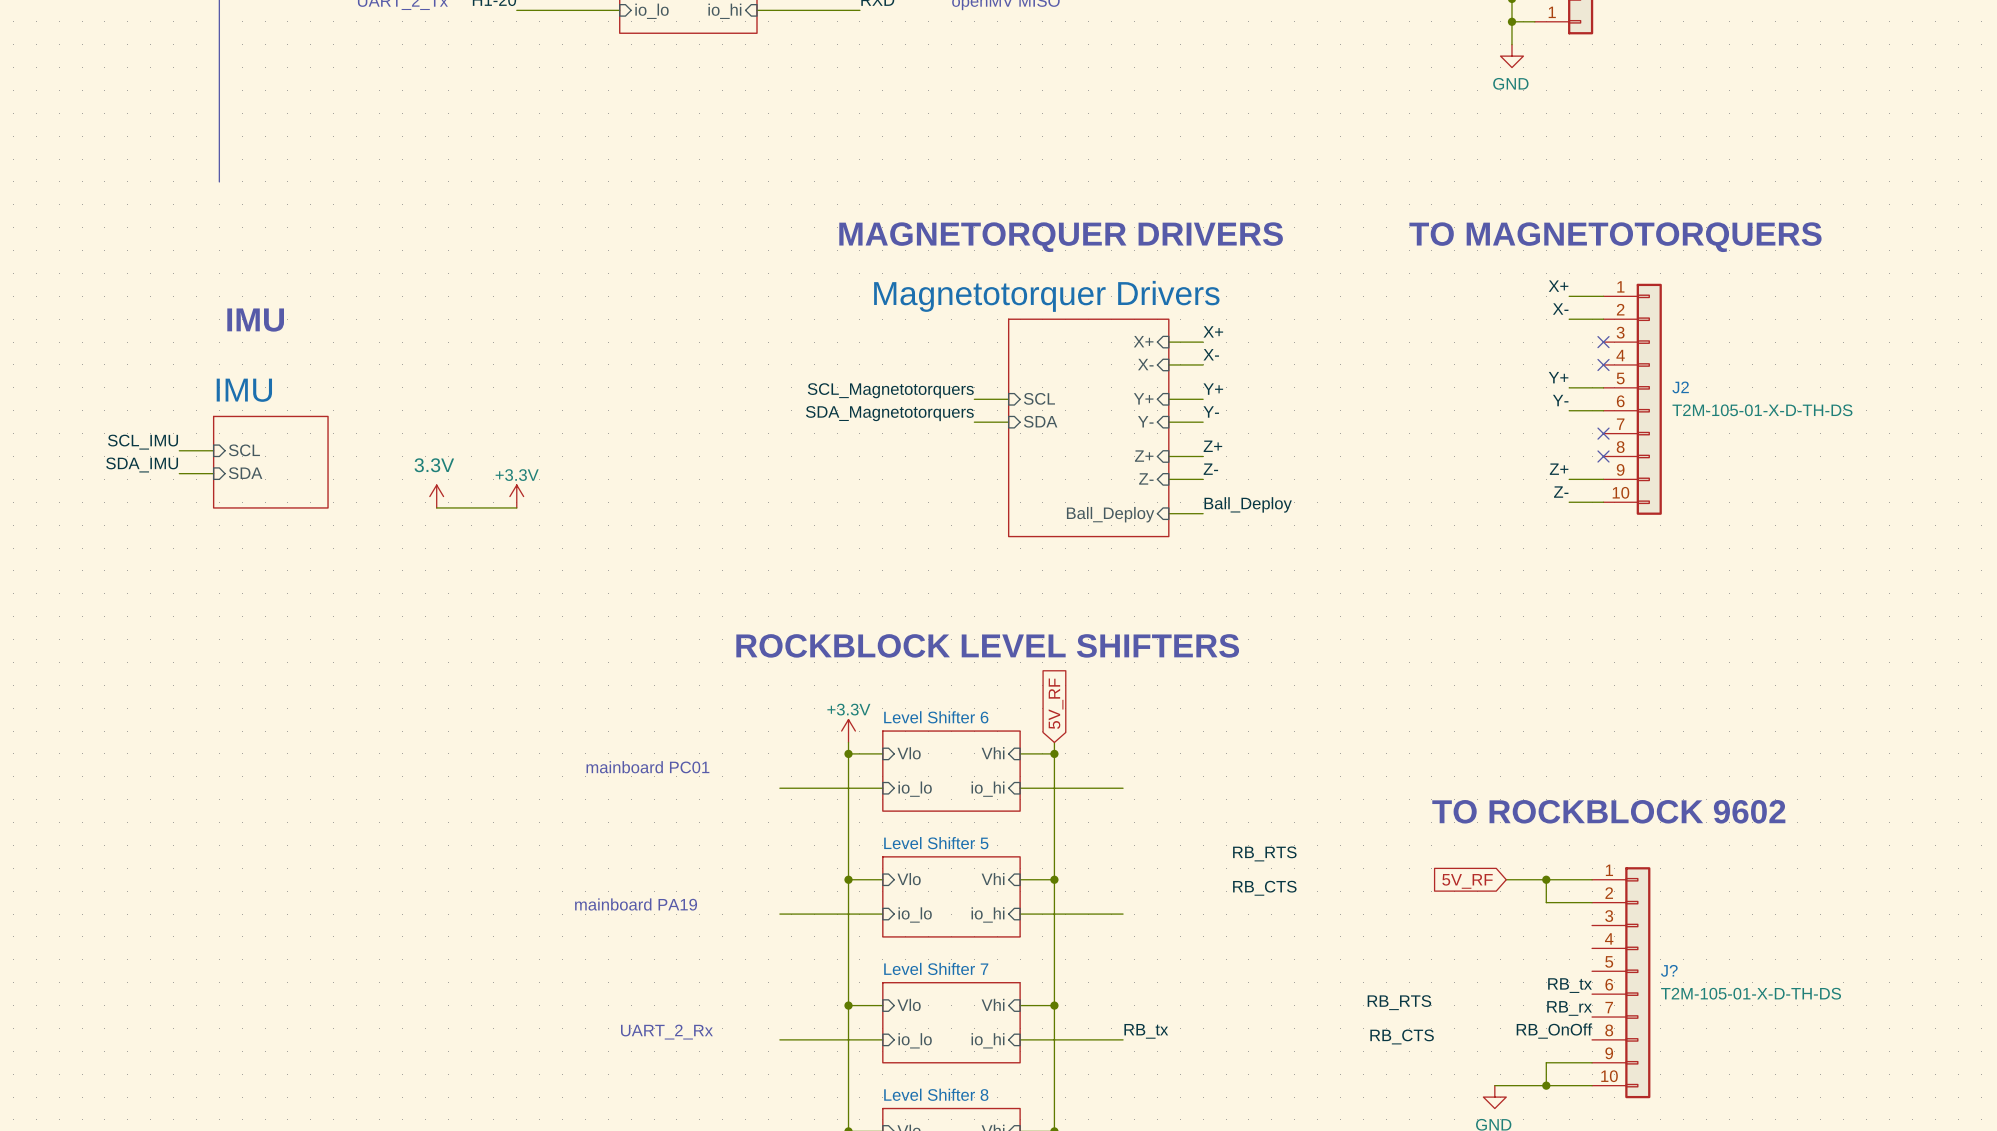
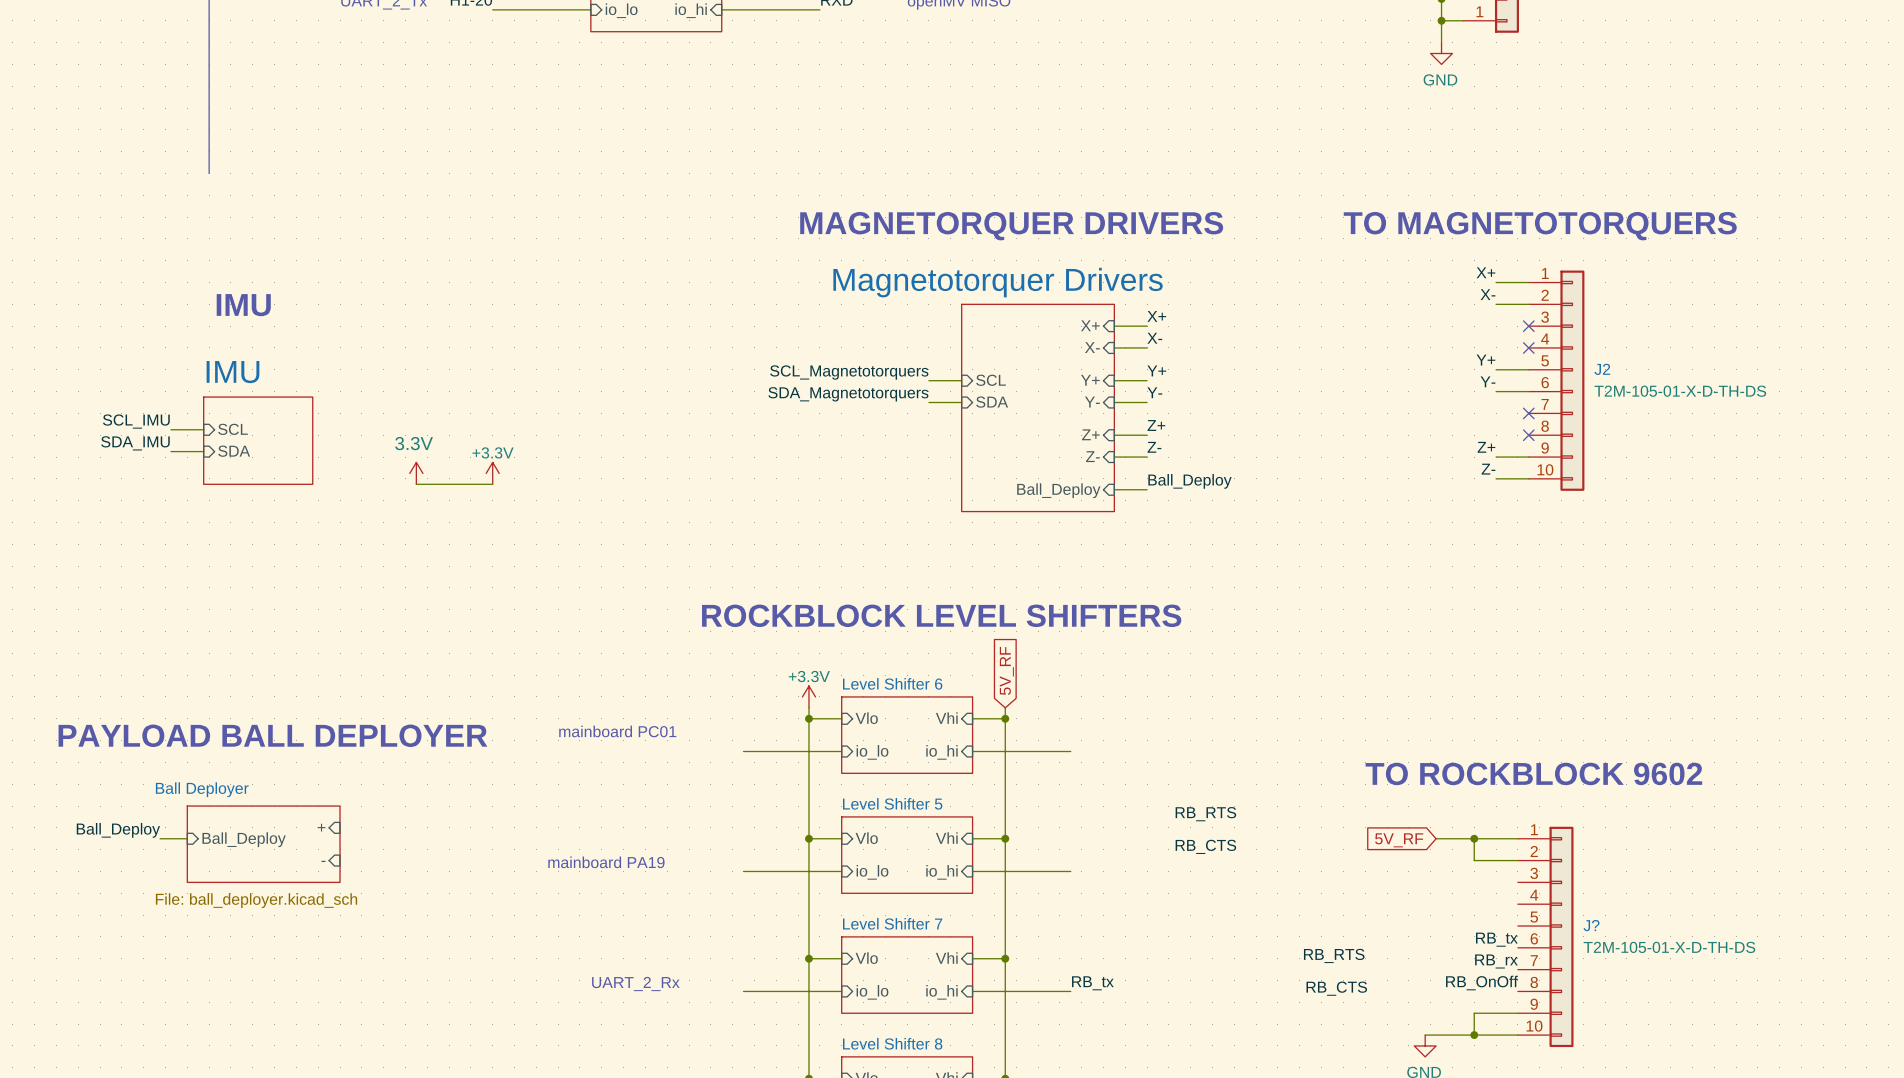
text: none -> PAYLOAD BALL DEPLOYER (272, 735)
sheet pin: none -> + (321, 827)
label: none -> Ball_Deploy (118, 830)
wire: none -> (160, 838) (187, 838)
sheet pin: none -> Ball_Deploy (244, 839)
sheet Ball Deployer: none -> File: ball_deployer.kicad_sch (263, 844)
sheet pin: none -> - (323, 861)

